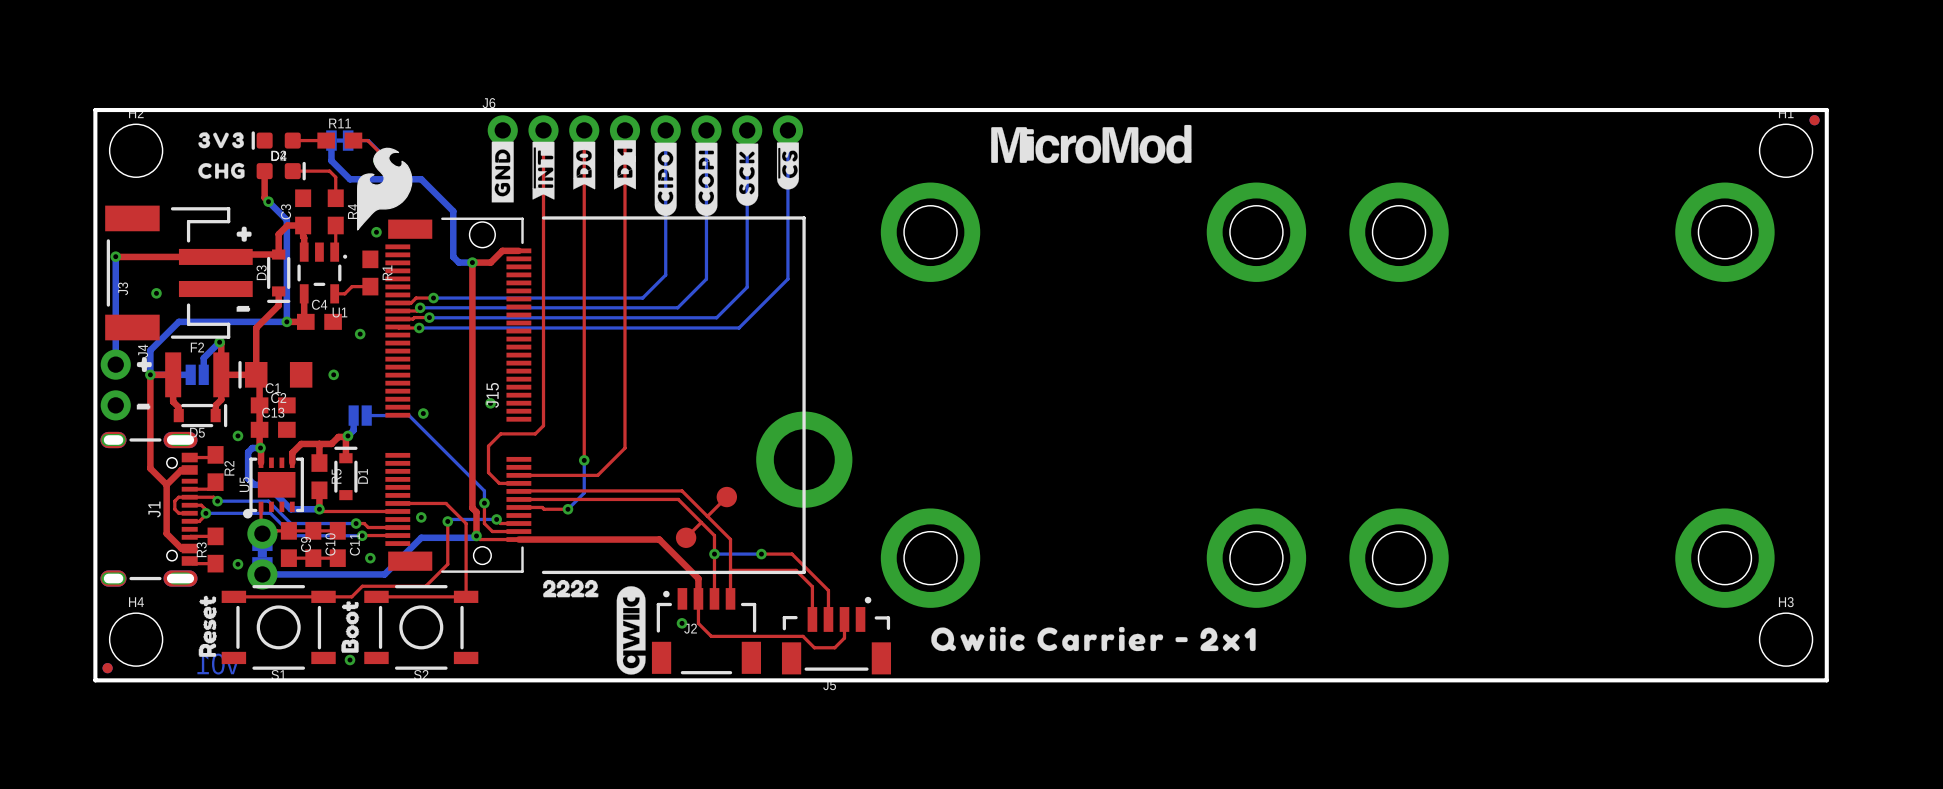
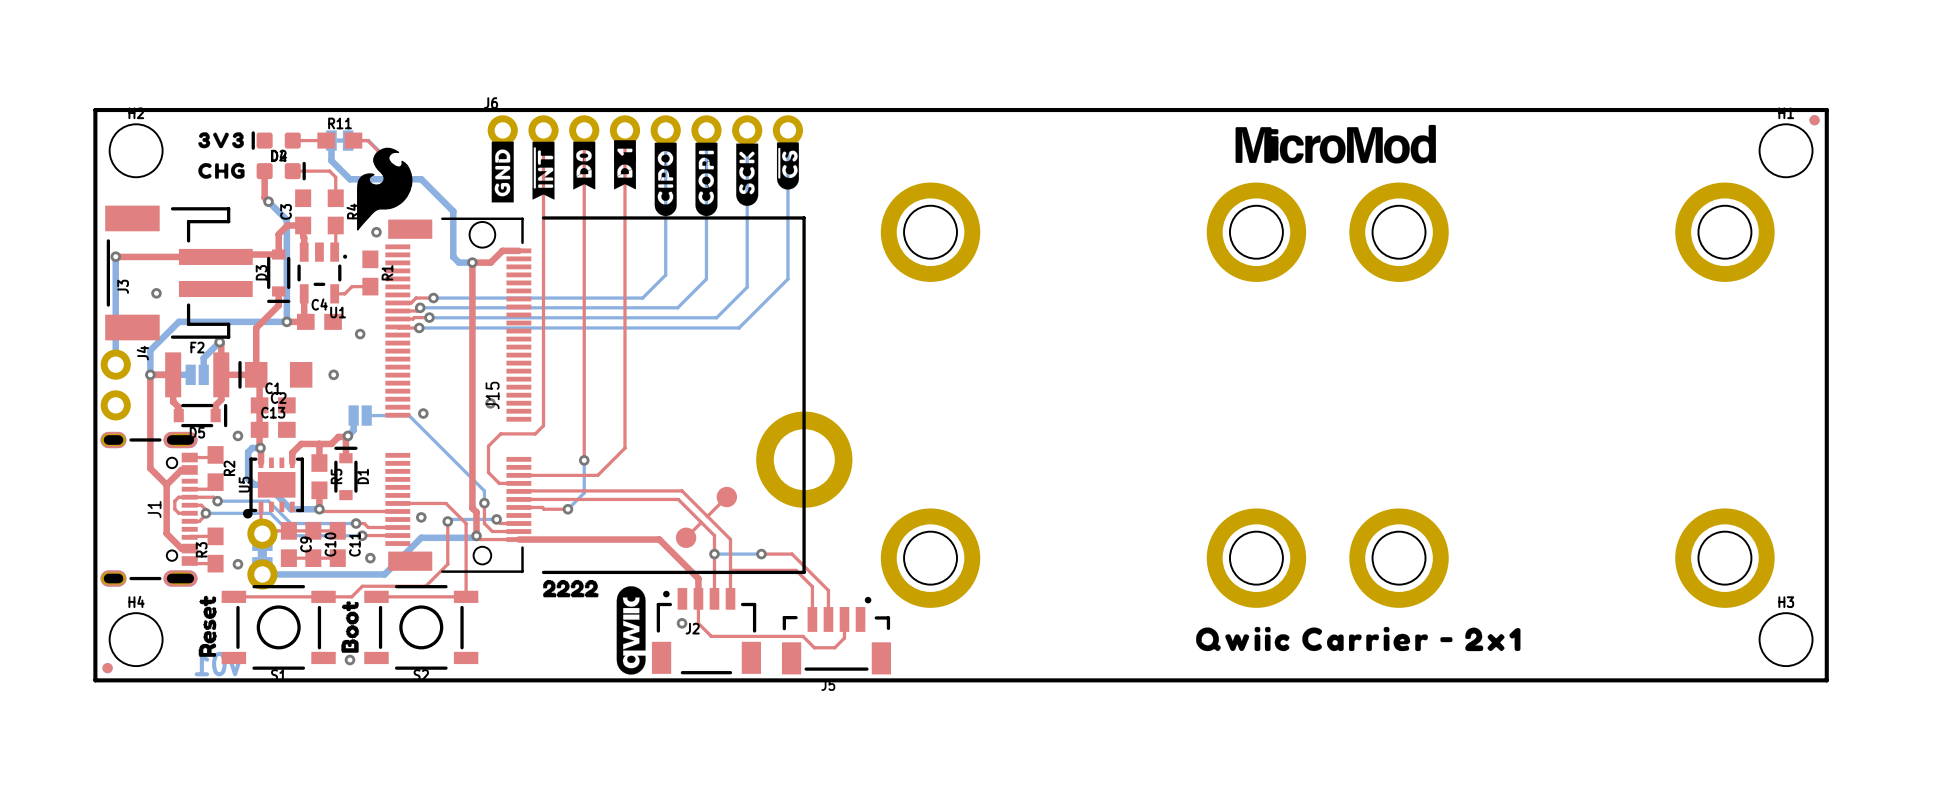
drawing position: (1091, 144) -> (1335, 144)
drawing: [236, 226, 252, 242] -> none
drawing: [236, 305, 251, 312] -> none
drawing: [136, 357, 152, 373] -> none
drawing: [136, 403, 151, 410] -> none
drawing position: (1093, 638) -> (1358, 638)

